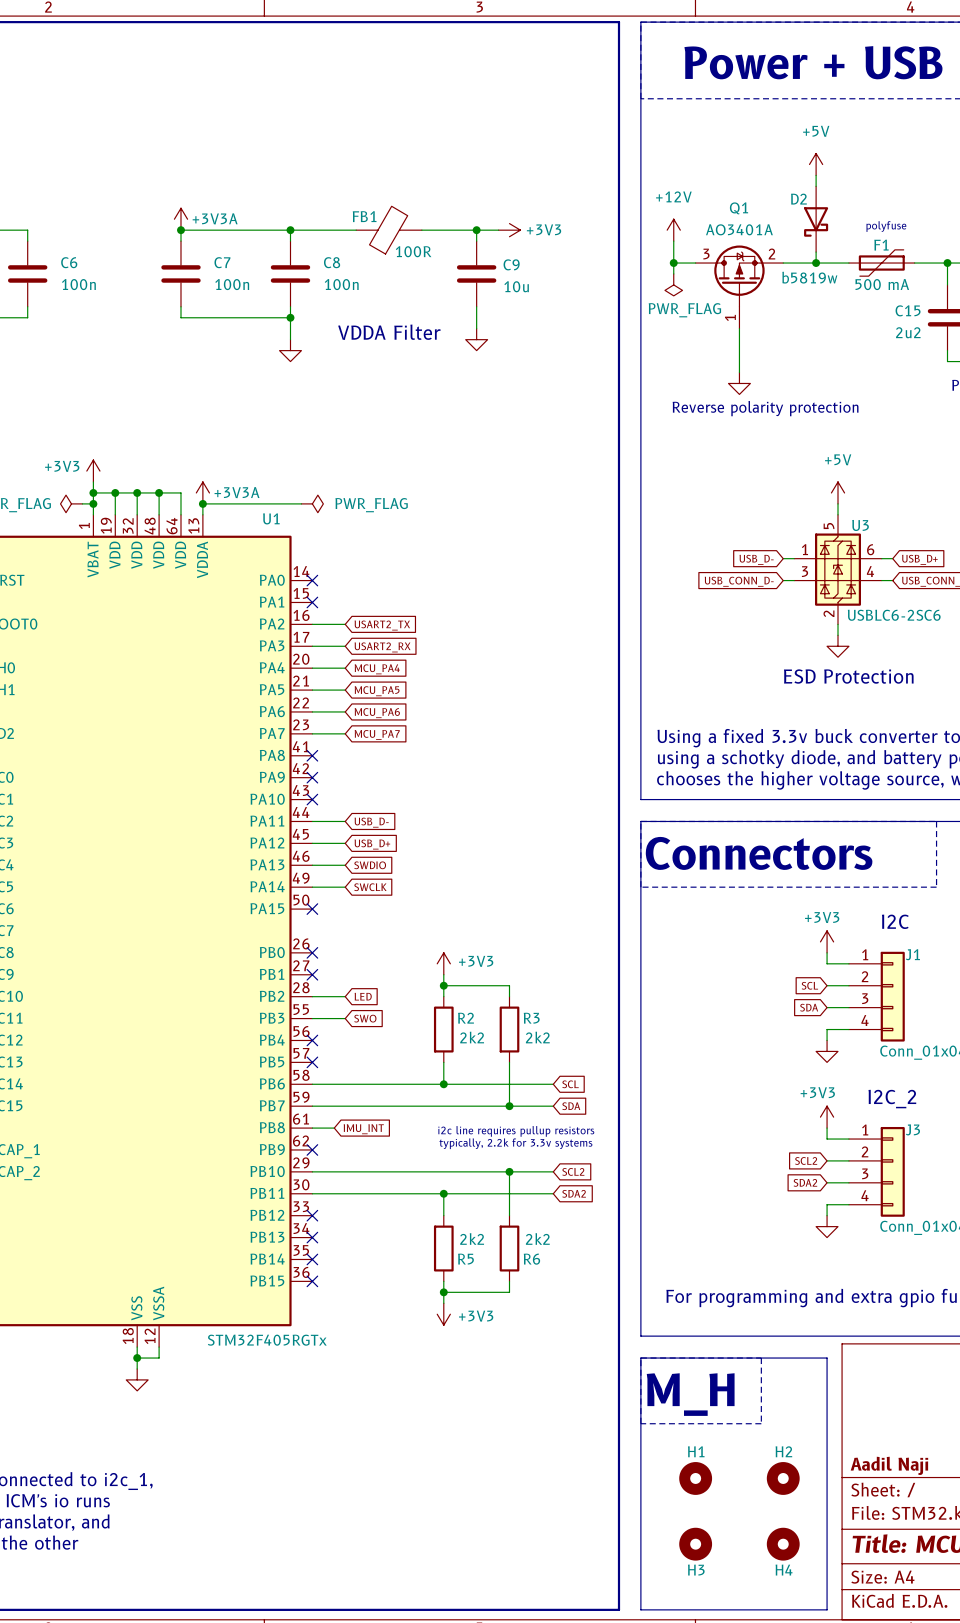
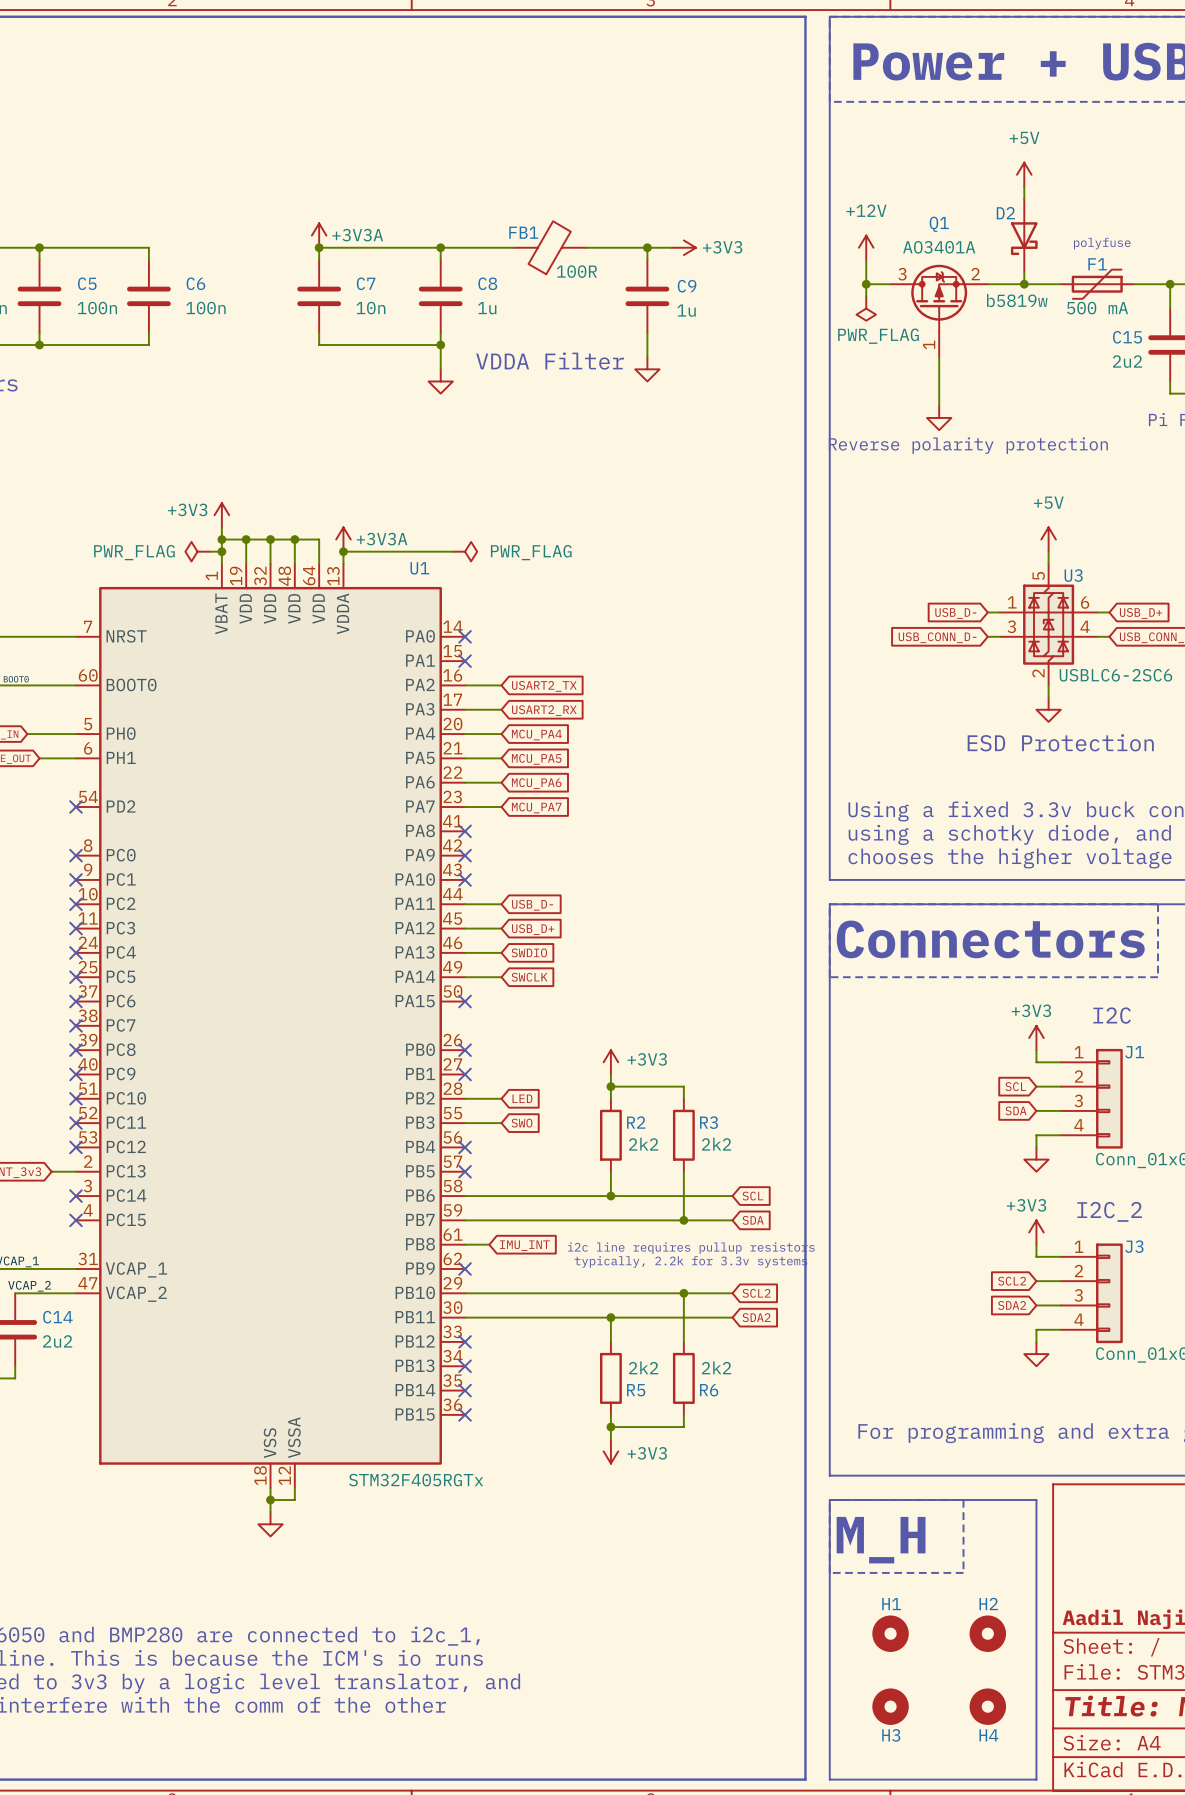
C7 value: 100n (232, 284) -> 10n (370, 308)
C8 value: 100n (341, 284) -> 1u (487, 308)
C9 value: 10u (516, 286) -> 1u (686, 310)

